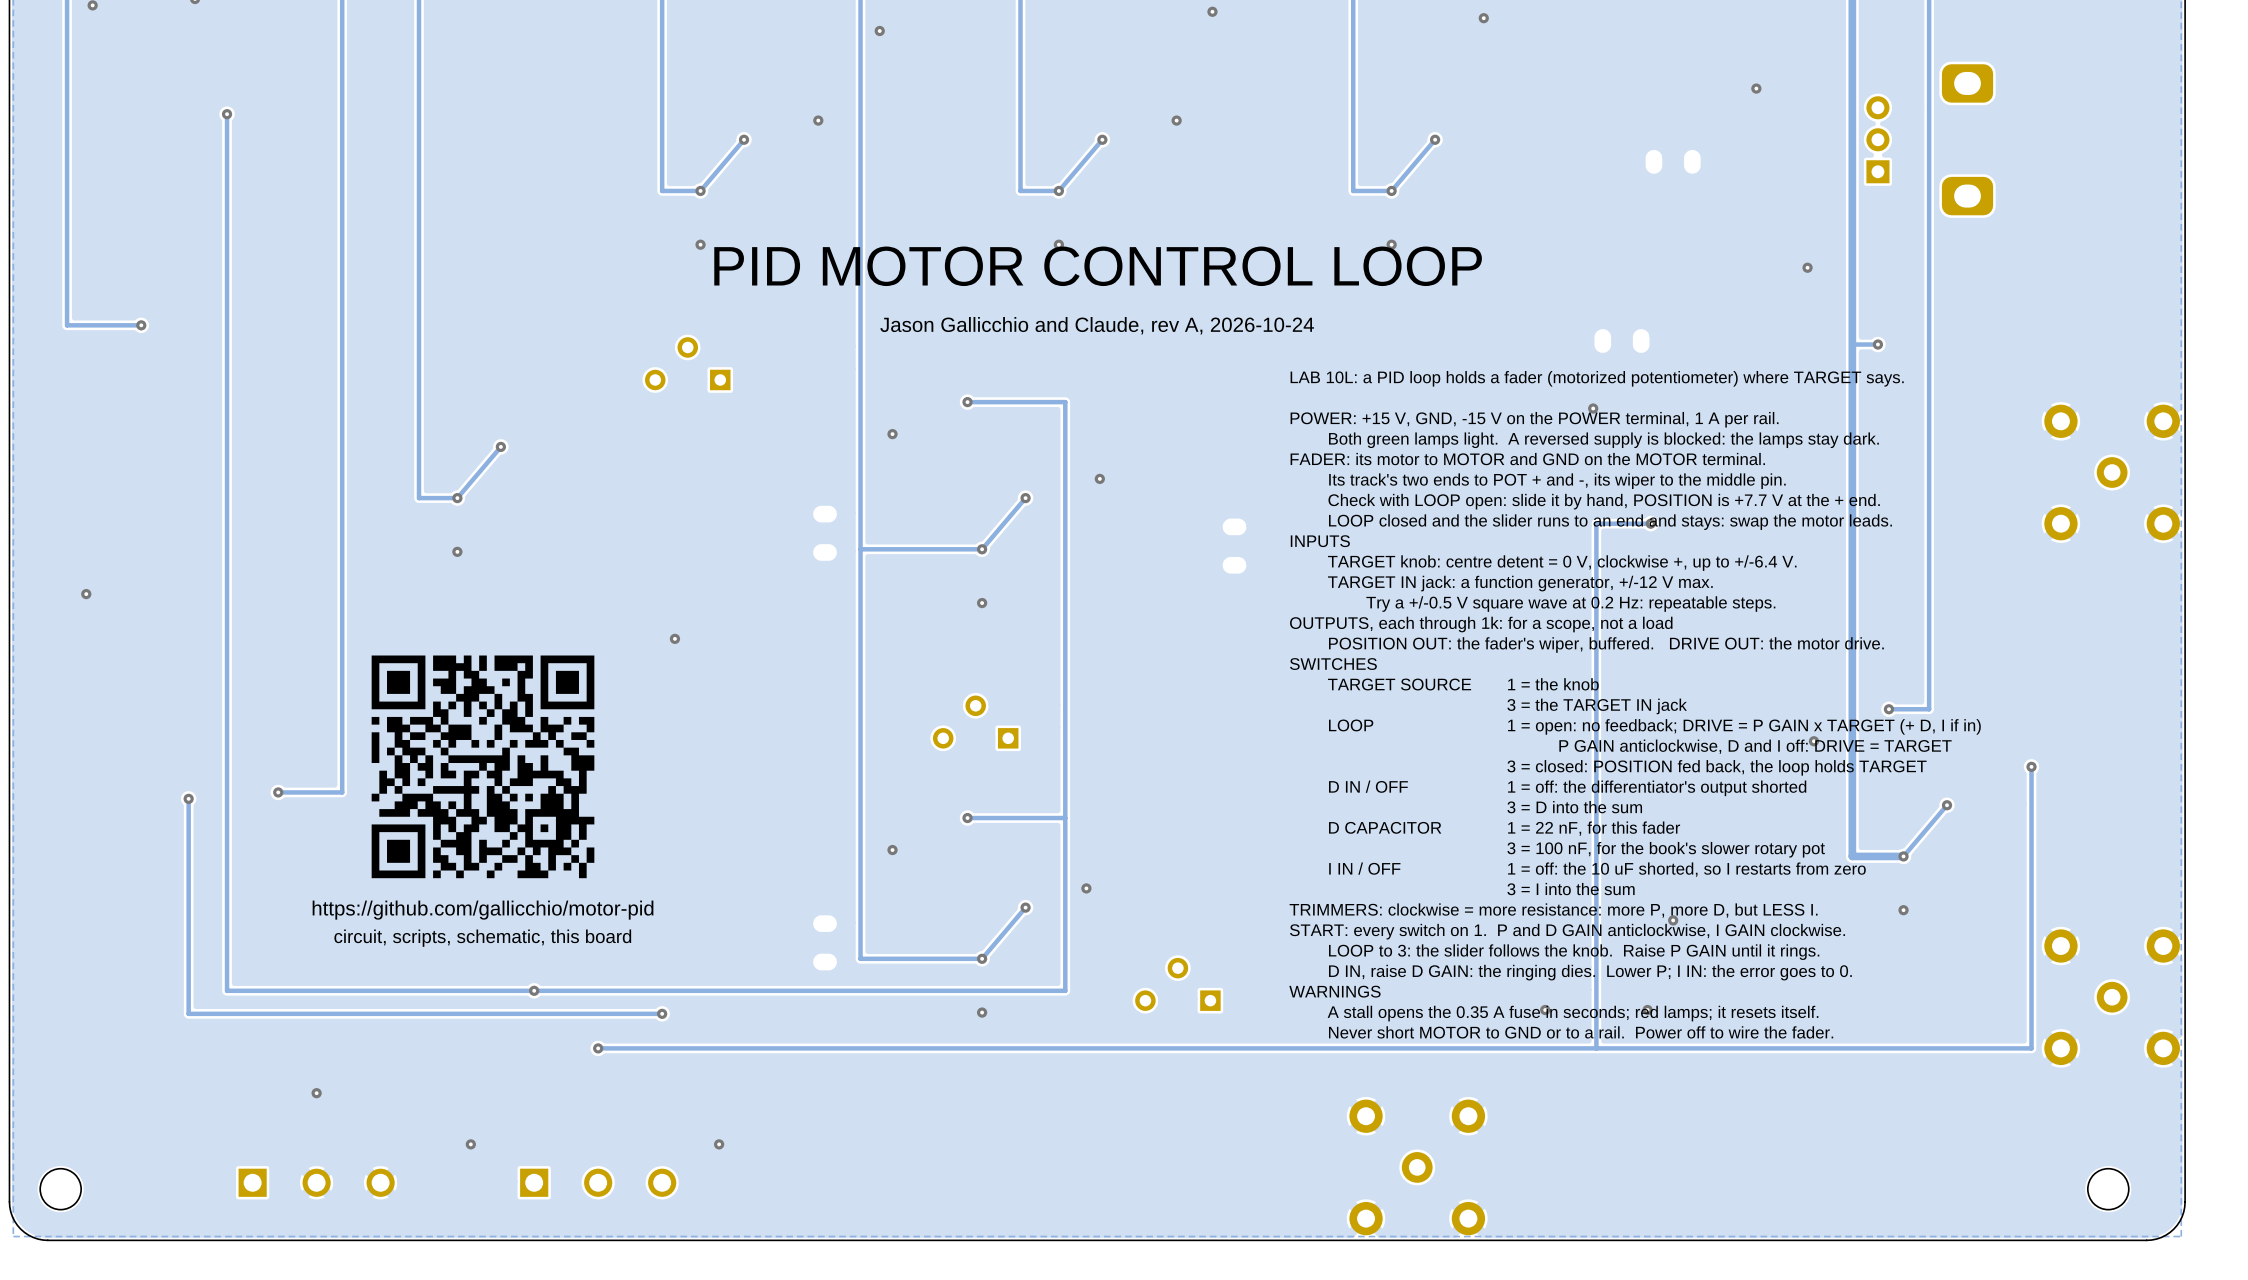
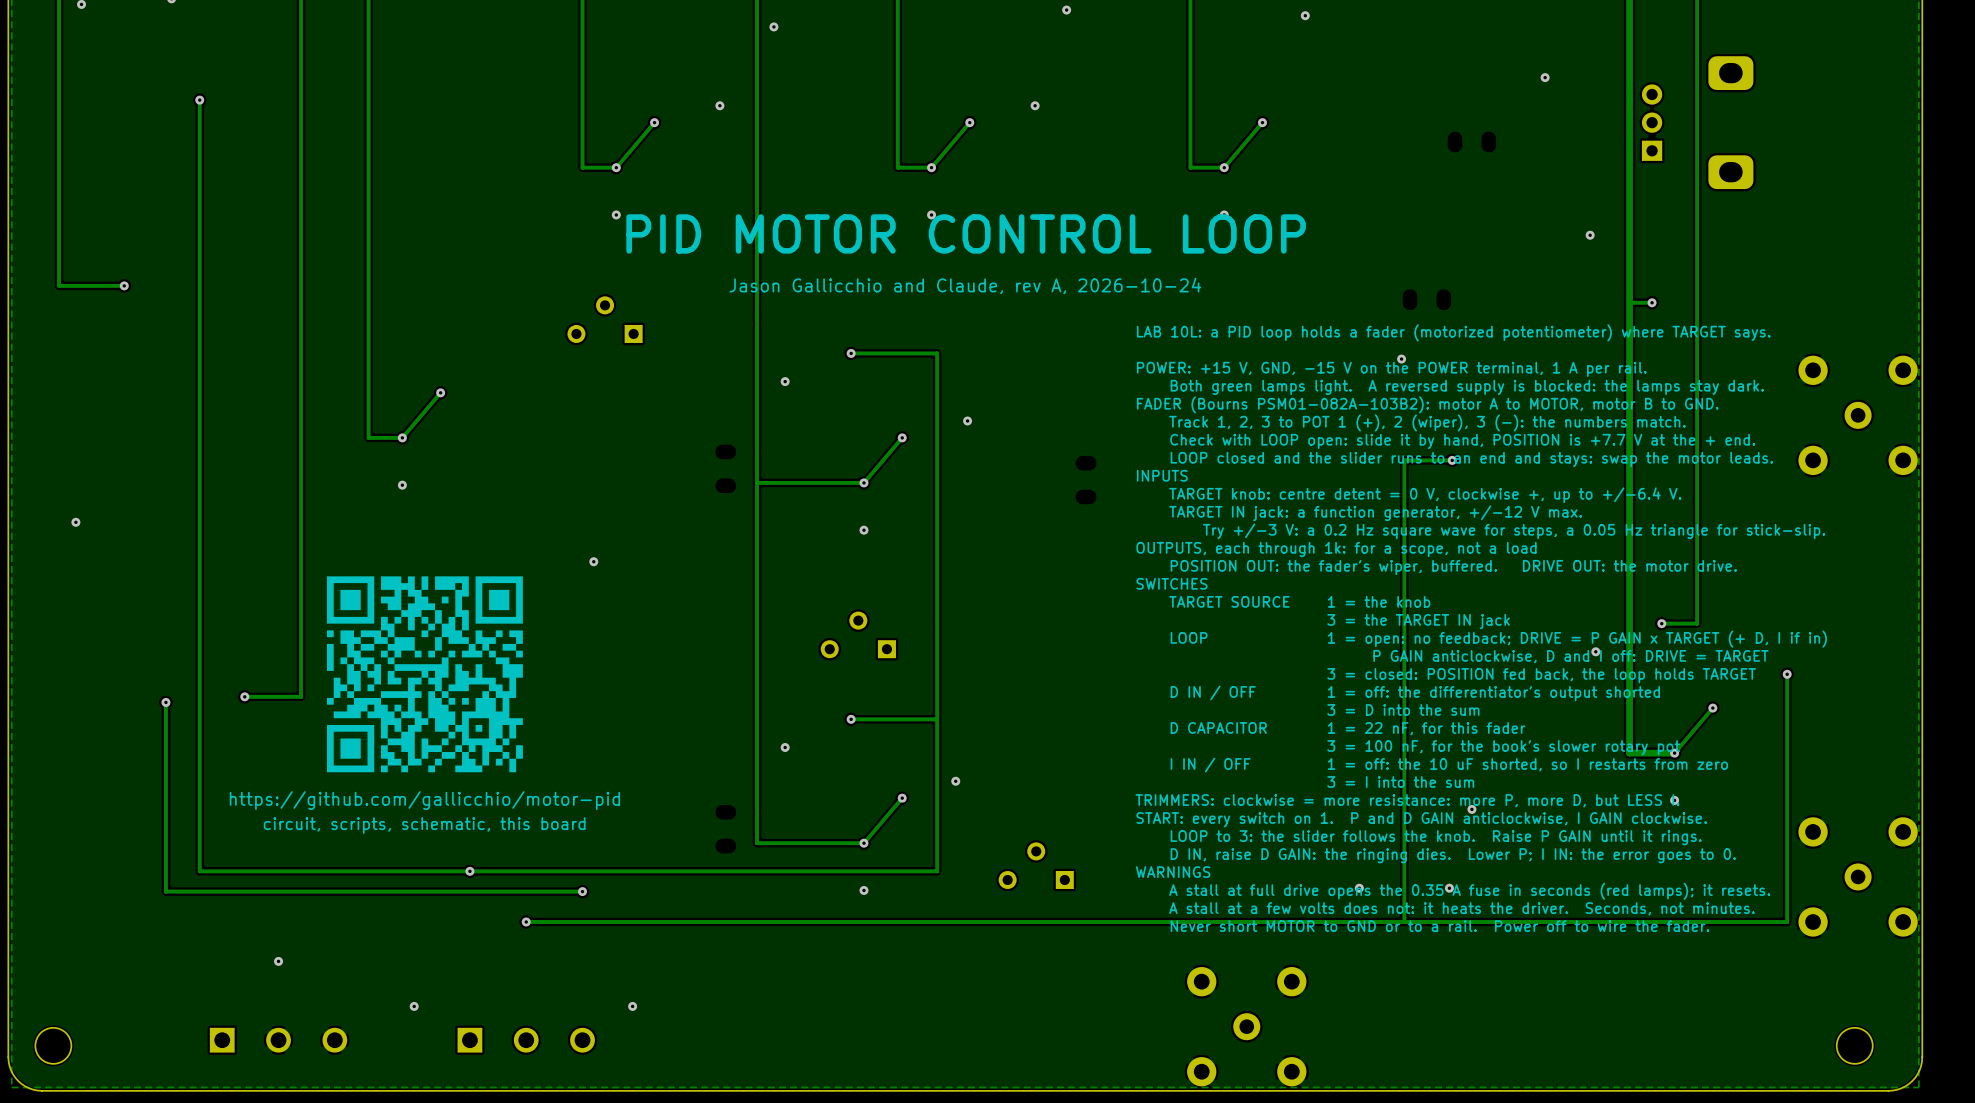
text: FADER: its motor to MOTOR and GND on the MOTOR terminal. (1527, 459) -> FADER (Bourns PSM01-082A-103B2): motor A to MOTOR, motor B to GND. (1427, 404)
text: Its track's two ends to POT + and -, its wiper to the middle pin. (1557, 481) -> Track 1, 2, 3 to POT 1 (+), 2 (wiper), 3 (-): the numbers match. (1427, 422)
text: Try a +/-0.5 V square wave at 0.2 Hz: repeatable steps. (1570, 604) -> Try +/-3 V: a 0.2 Hz square wave for steps, a 0.05 Hz triangle for stick-slip. (1514, 531)
text: A stall opens the 0.35 A fuse in seconds; red lamps; it resets itself. (1573, 1013) -> A stall at full drive opens the 0.35 A fuse in seconds (red lamps); it resets. (1469, 891)
text: Never short MOTOR to GND or to a rail. Power off to wire the fader. (1581, 1032) -> A stall at a few volts does not: it heats the driver. Seconds, not minutes. (1461, 908)
text: none -> Never short MOTOR to GND or to a rail. Power off to wire the fader. (1440, 926)

